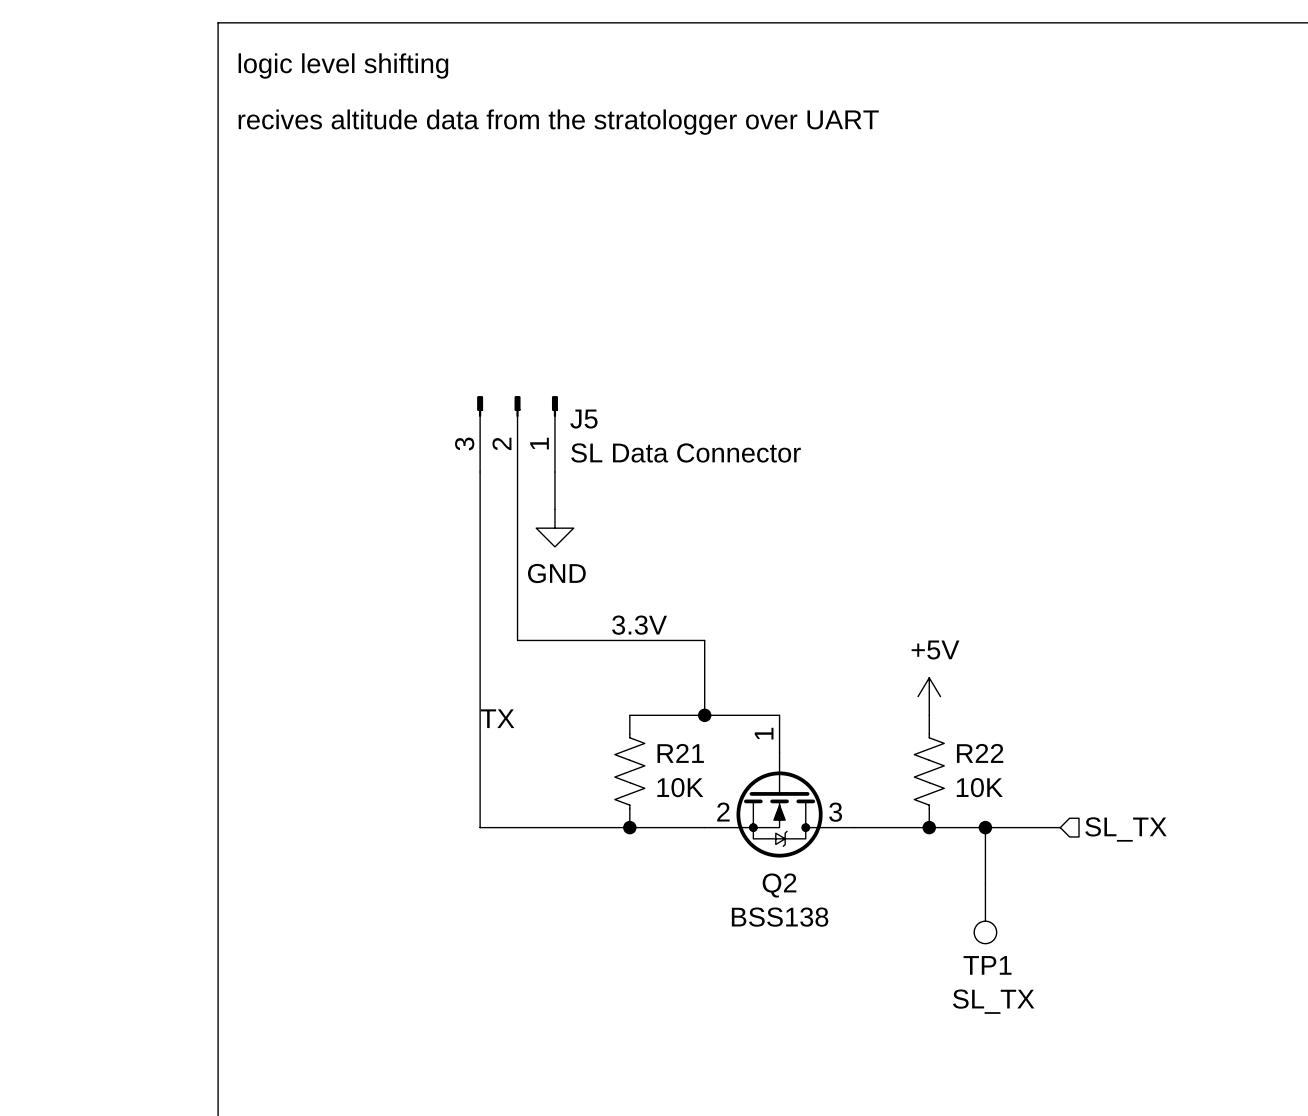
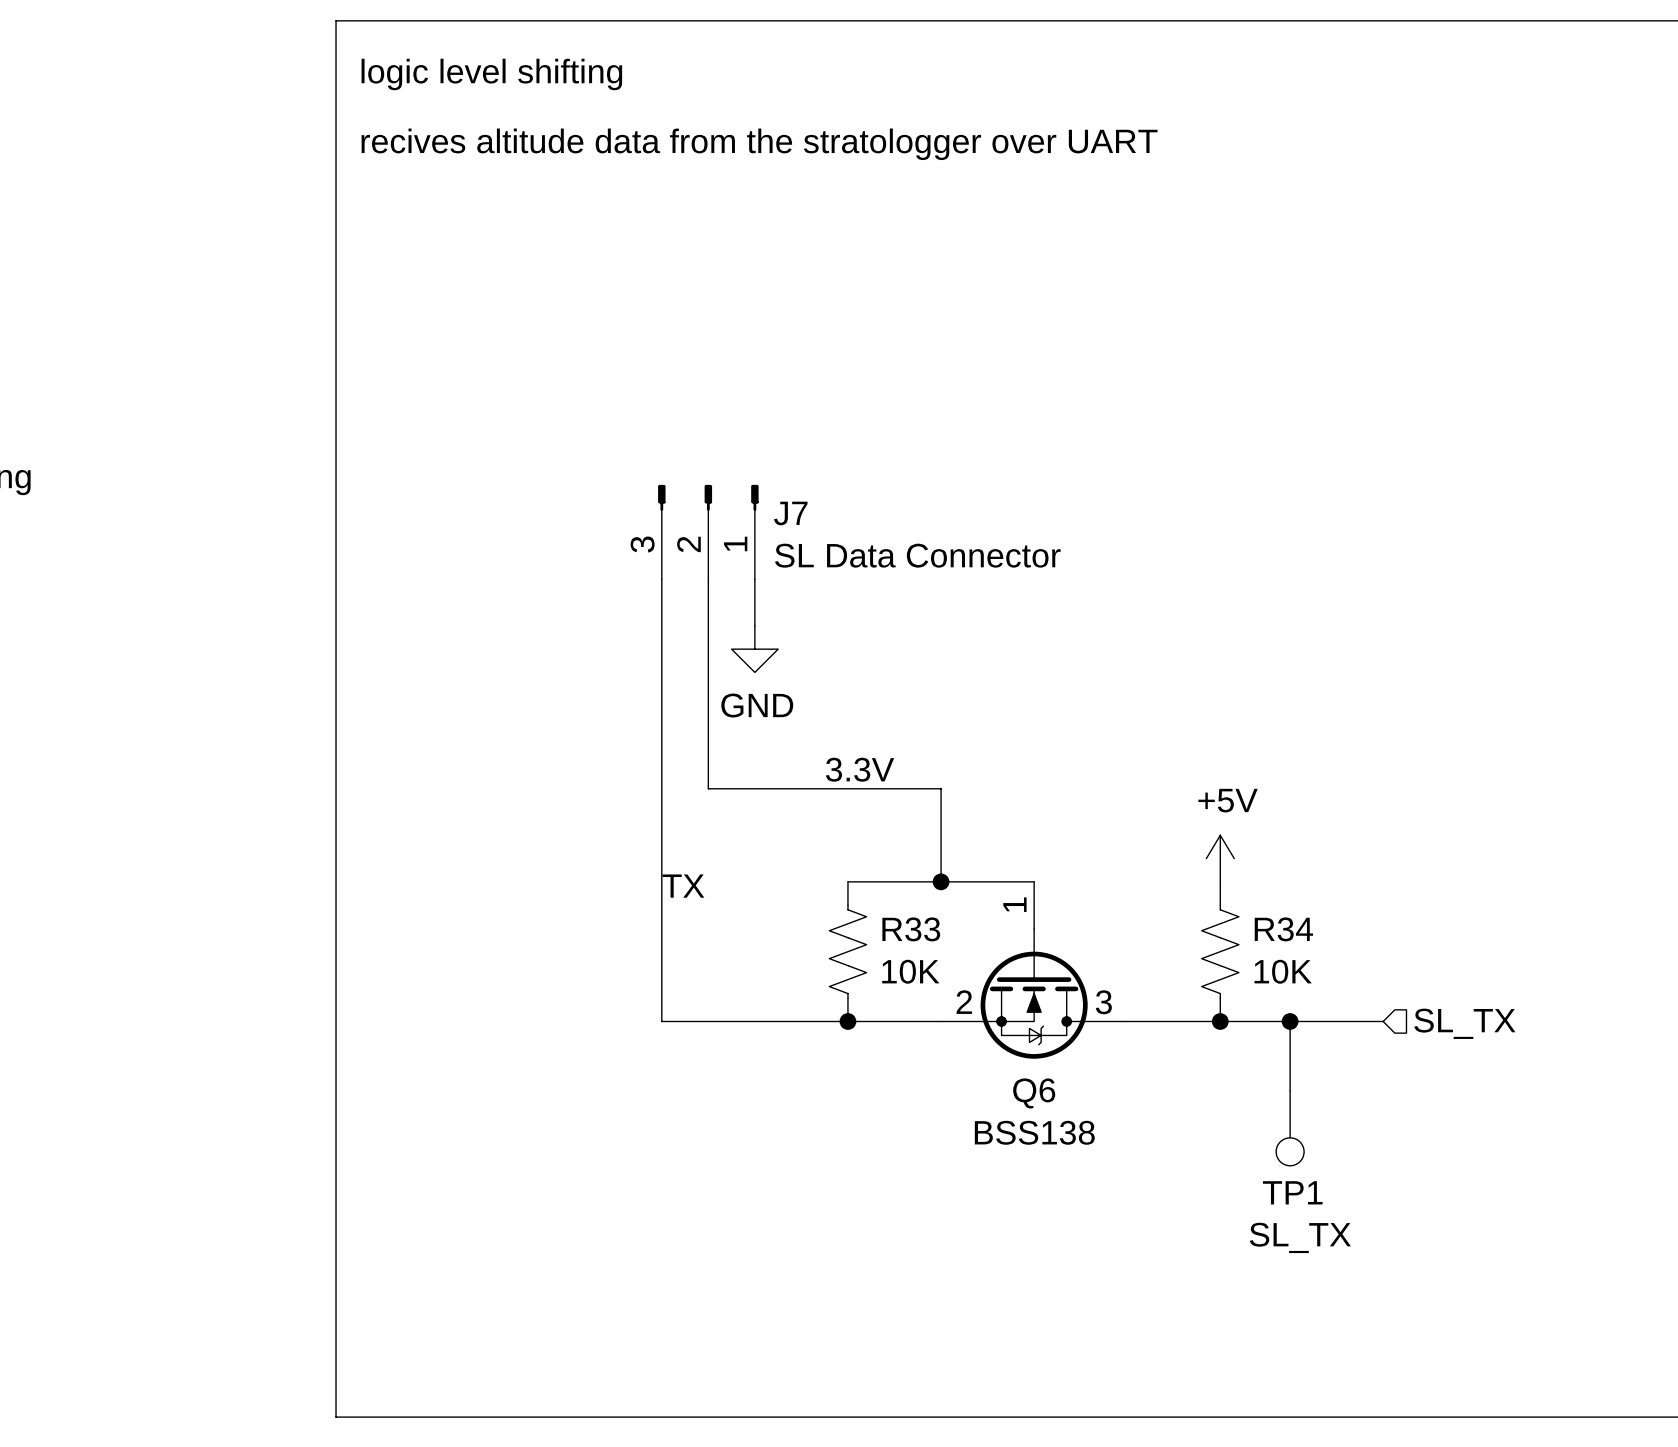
J5 name: J5 (583, 419) -> J7 (790, 513)
R21 name: R21 (680, 753) -> R33 (911, 929)
R22 name: R22 (980, 753) -> R34 (1283, 929)
Q2 name: Q2 (779, 885) -> Q6 (1034, 1093)

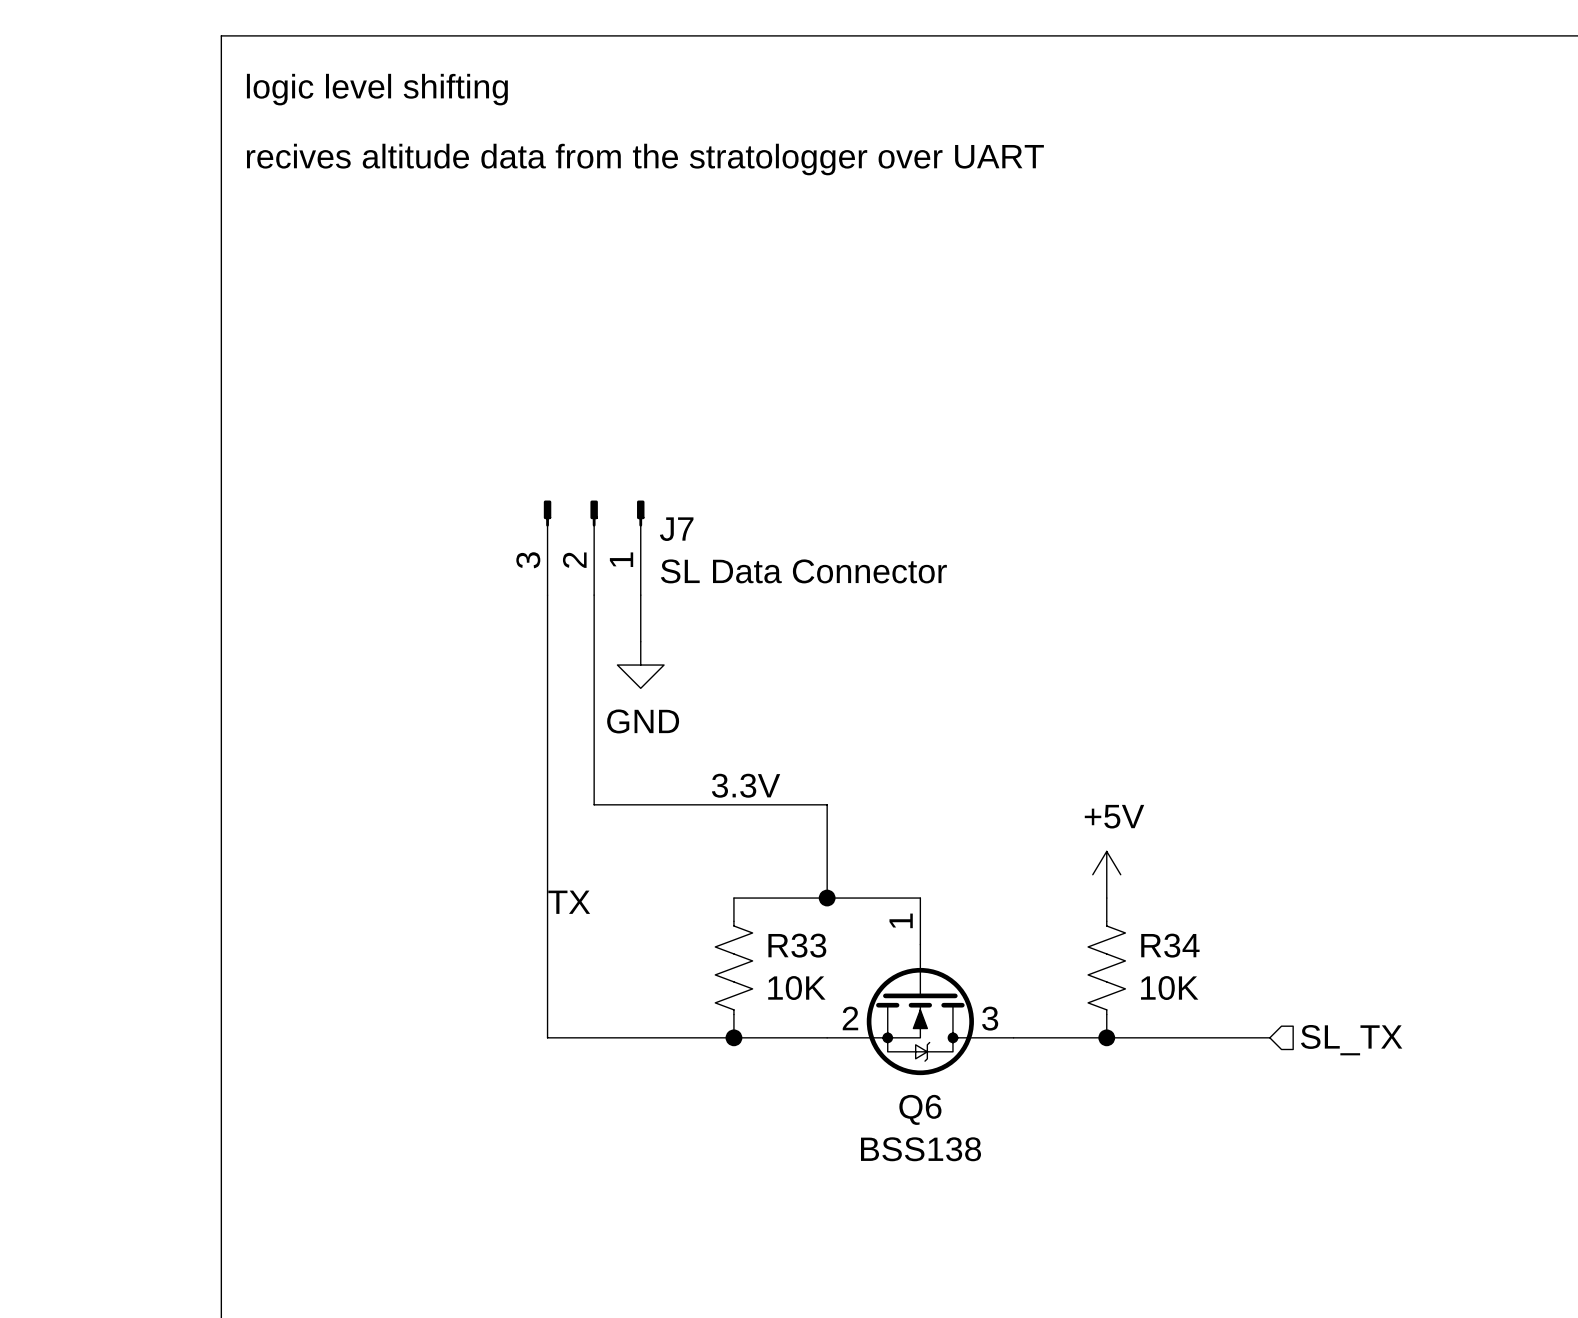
wire: (1290, 1021) (1290, 1091) -> none
junction: (1290, 1021) -> none
TP1: SL_TX (1290, 1128) -> none

